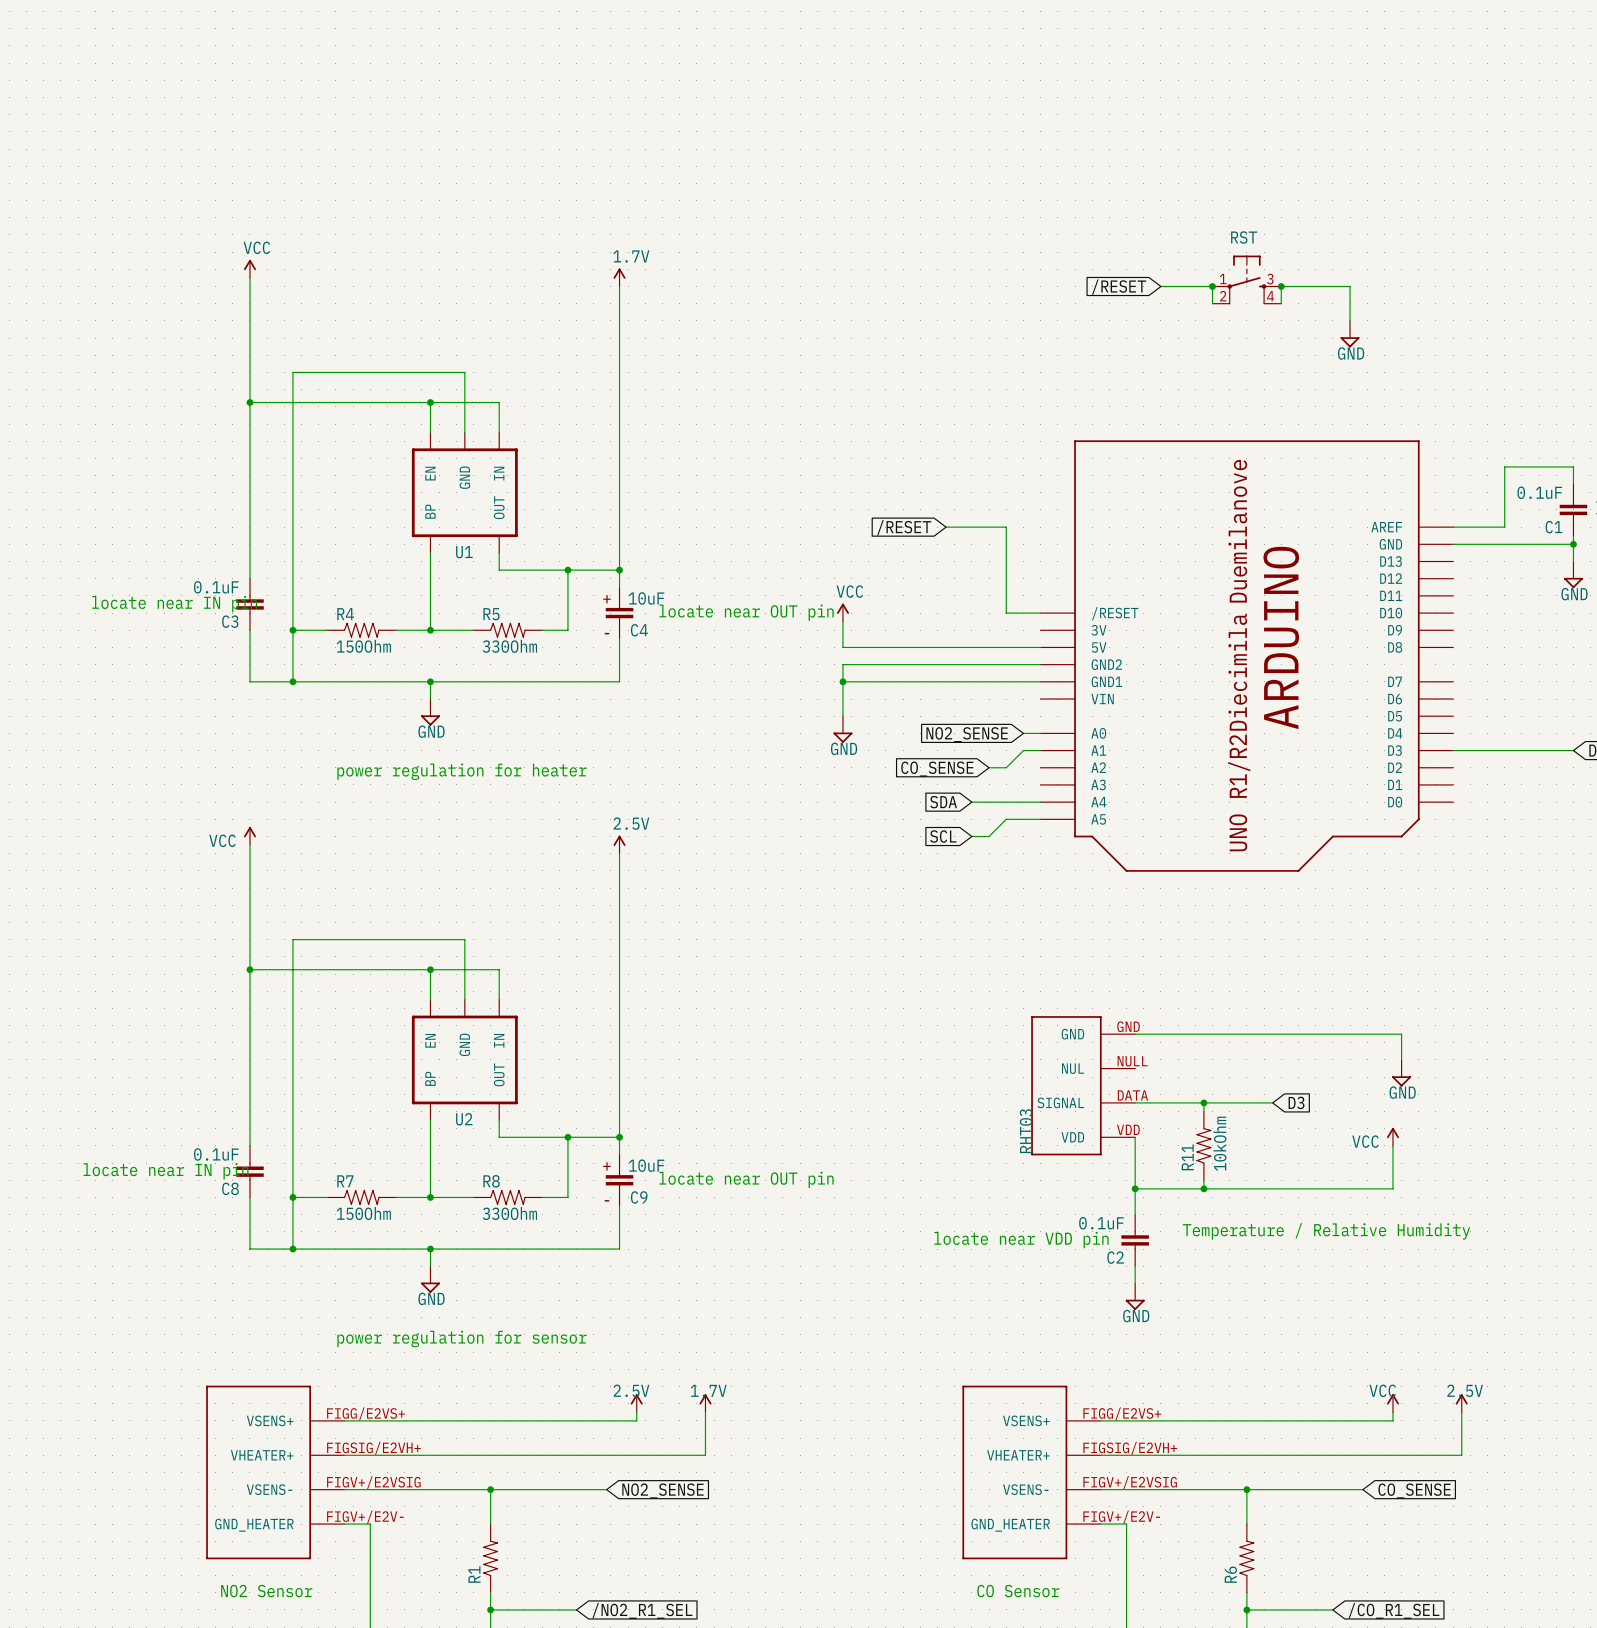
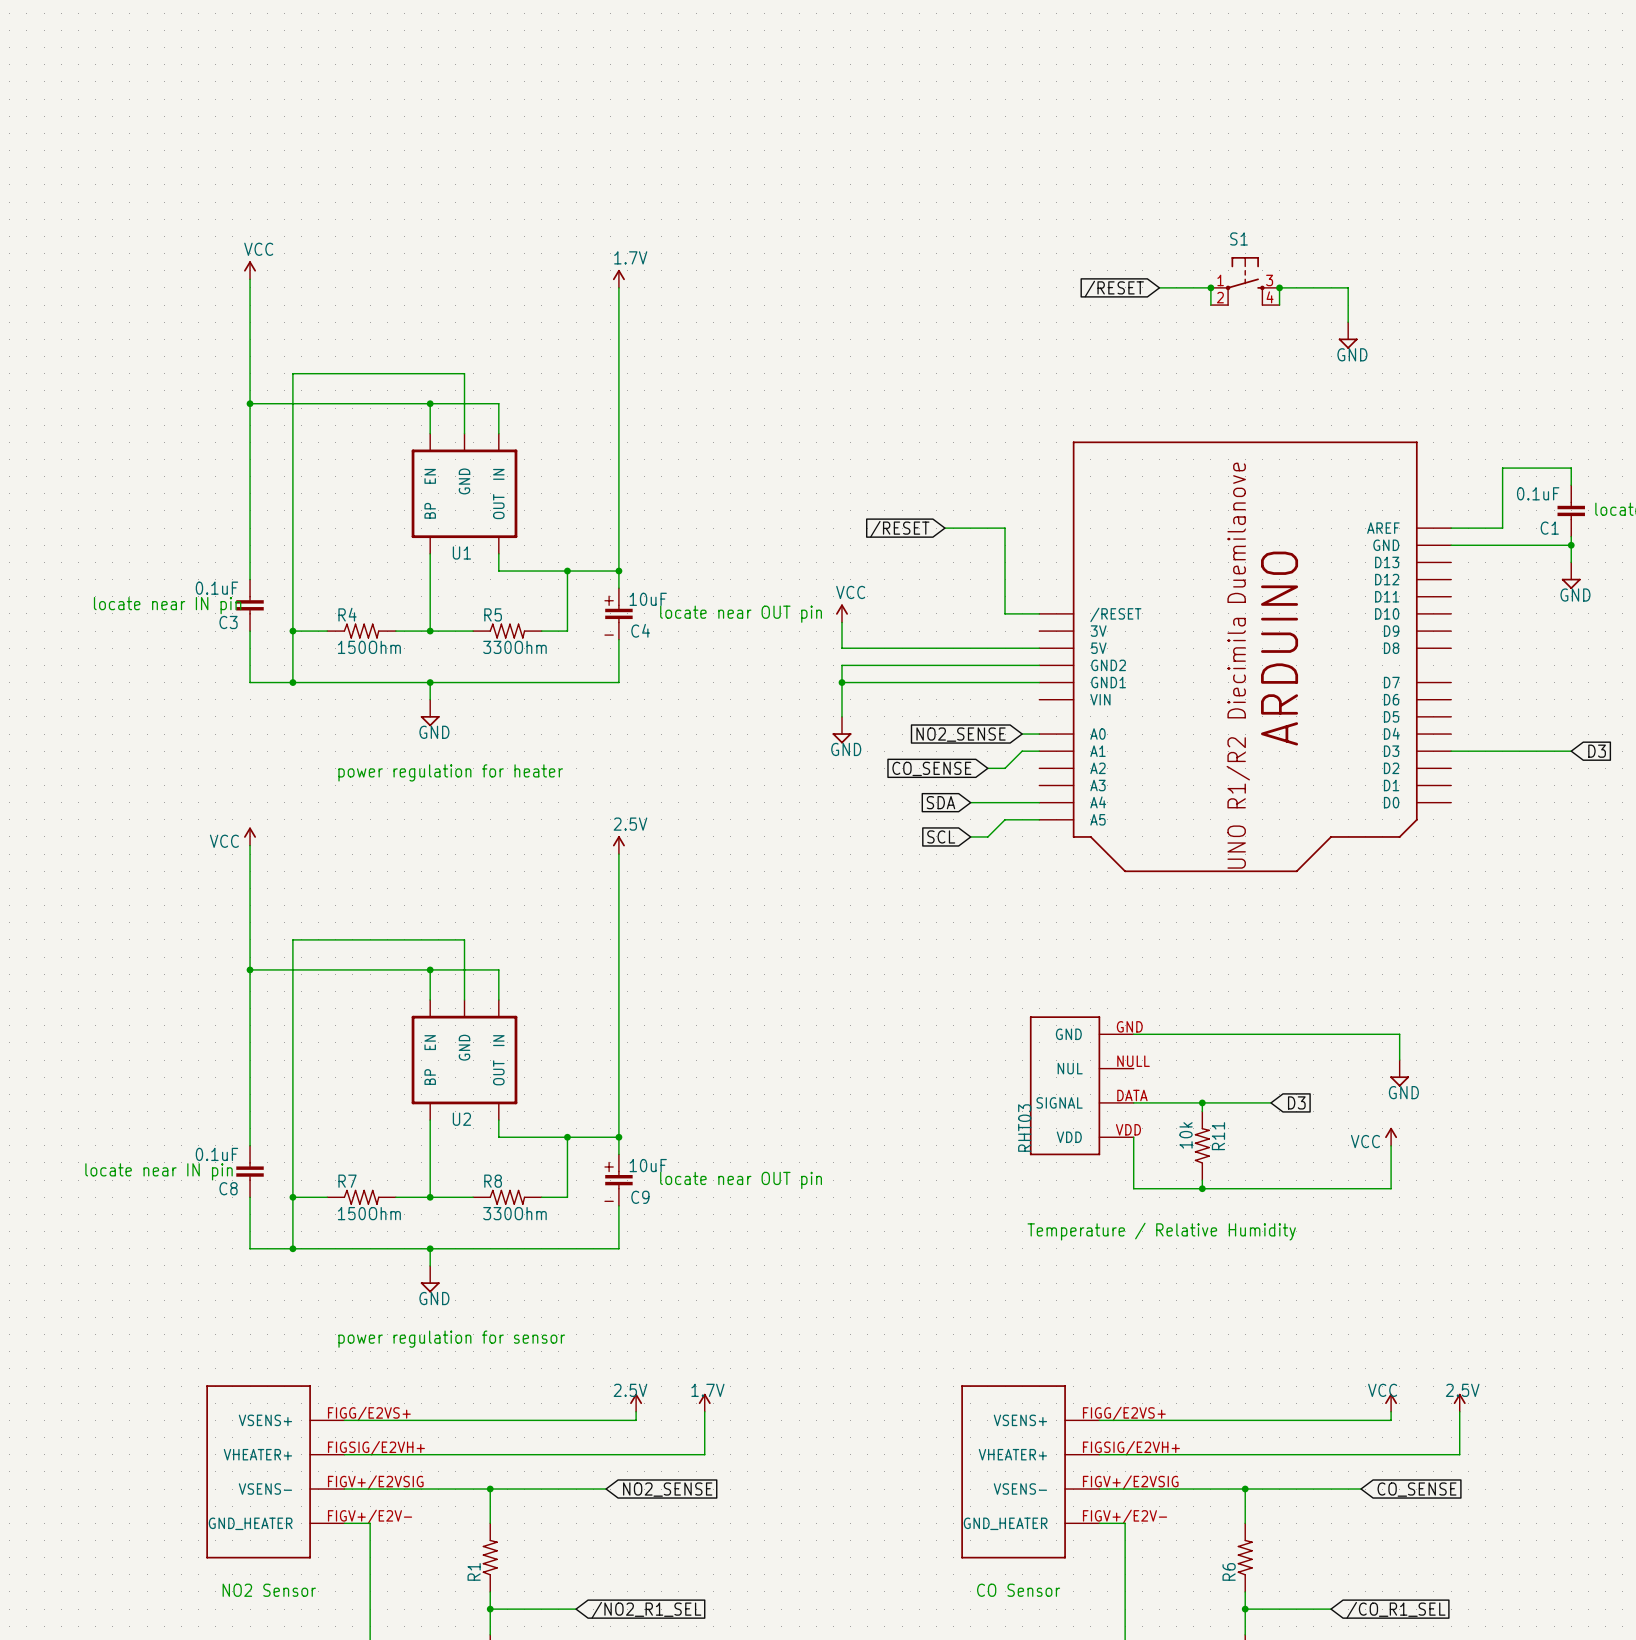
RST name: RST (1244, 237) -> S1 (1238, 238)
R11 value: 10kOhm (1219, 1143) -> 10k (1186, 1135)
R11 name position: R11 (1187, 1157) -> R11 (1218, 1136)
wire: (1135, 1188) (1135, 1214) -> none
junction: (1135, 1188) -> none
text position: Temperature / Relative Humidity (1326, 1231) -> Temperature / Relative Humidity (1161, 1231)
text: locate near VDD pin (1021, 1240) -> none
C2: 0.1uF (1135, 1240) -> none
wire: (1135, 1266) (1135, 1283) -> none
power symbol: GND (1135, 1296) -> none

